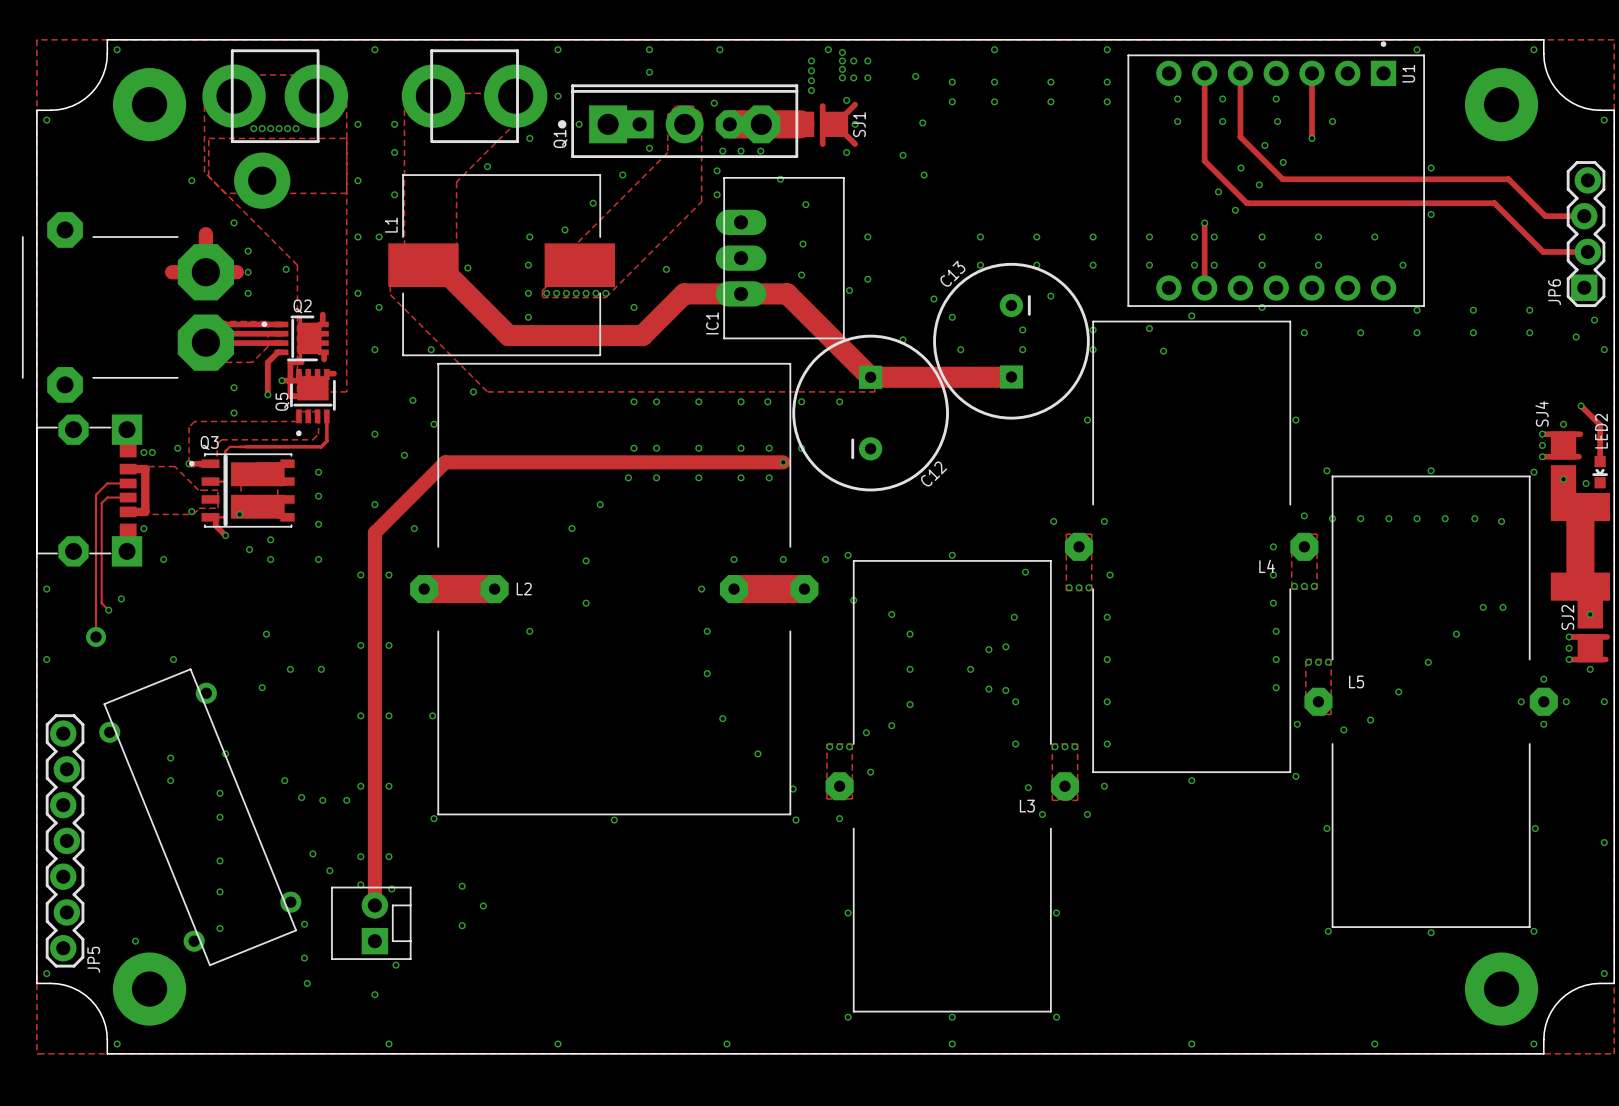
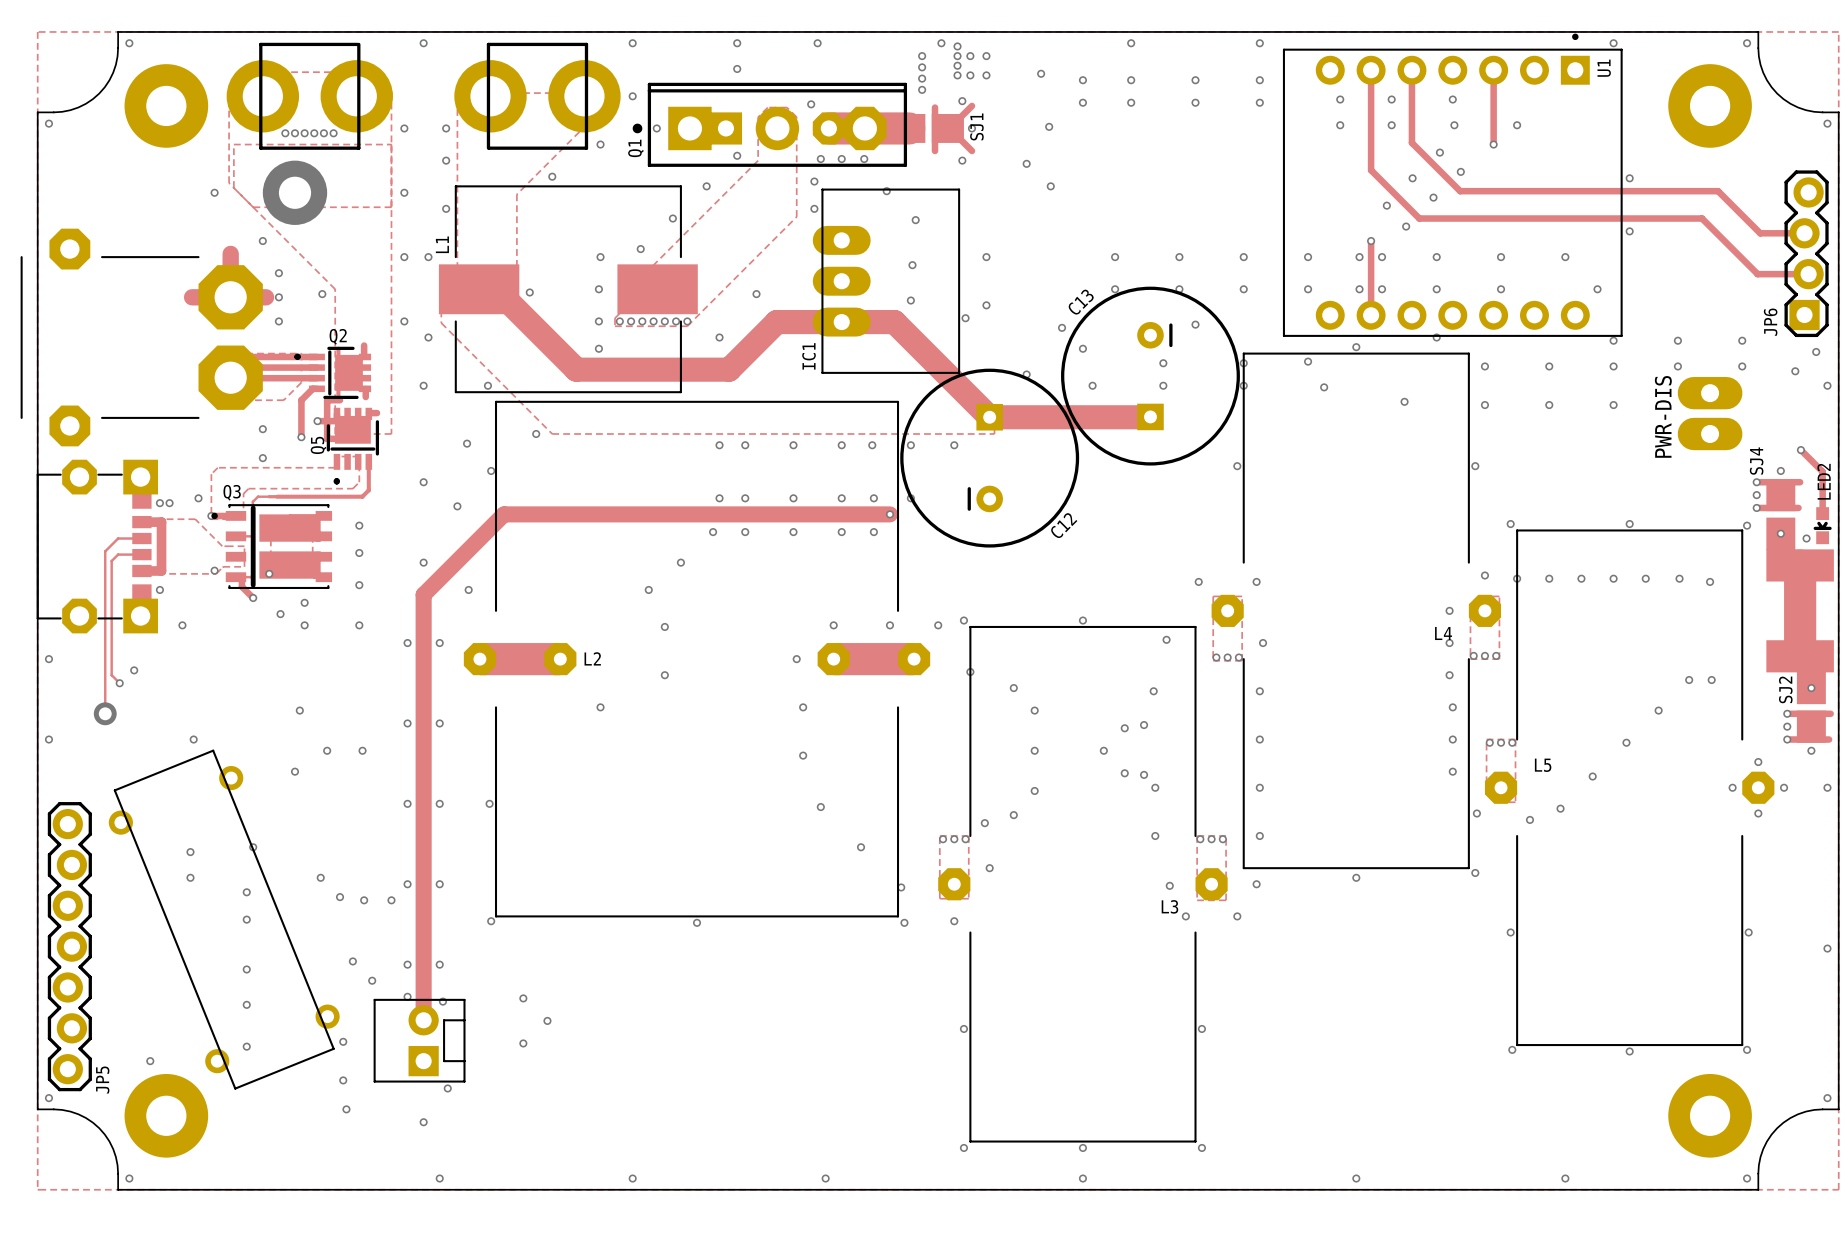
via: none -> (1404, 401)
via: none -> (1484, 405)
via: none -> (1549, 405)
via: none -> (1613, 405)
text: none -> PWR-DIS (1663, 416)
part: none -> (1710, 413)

